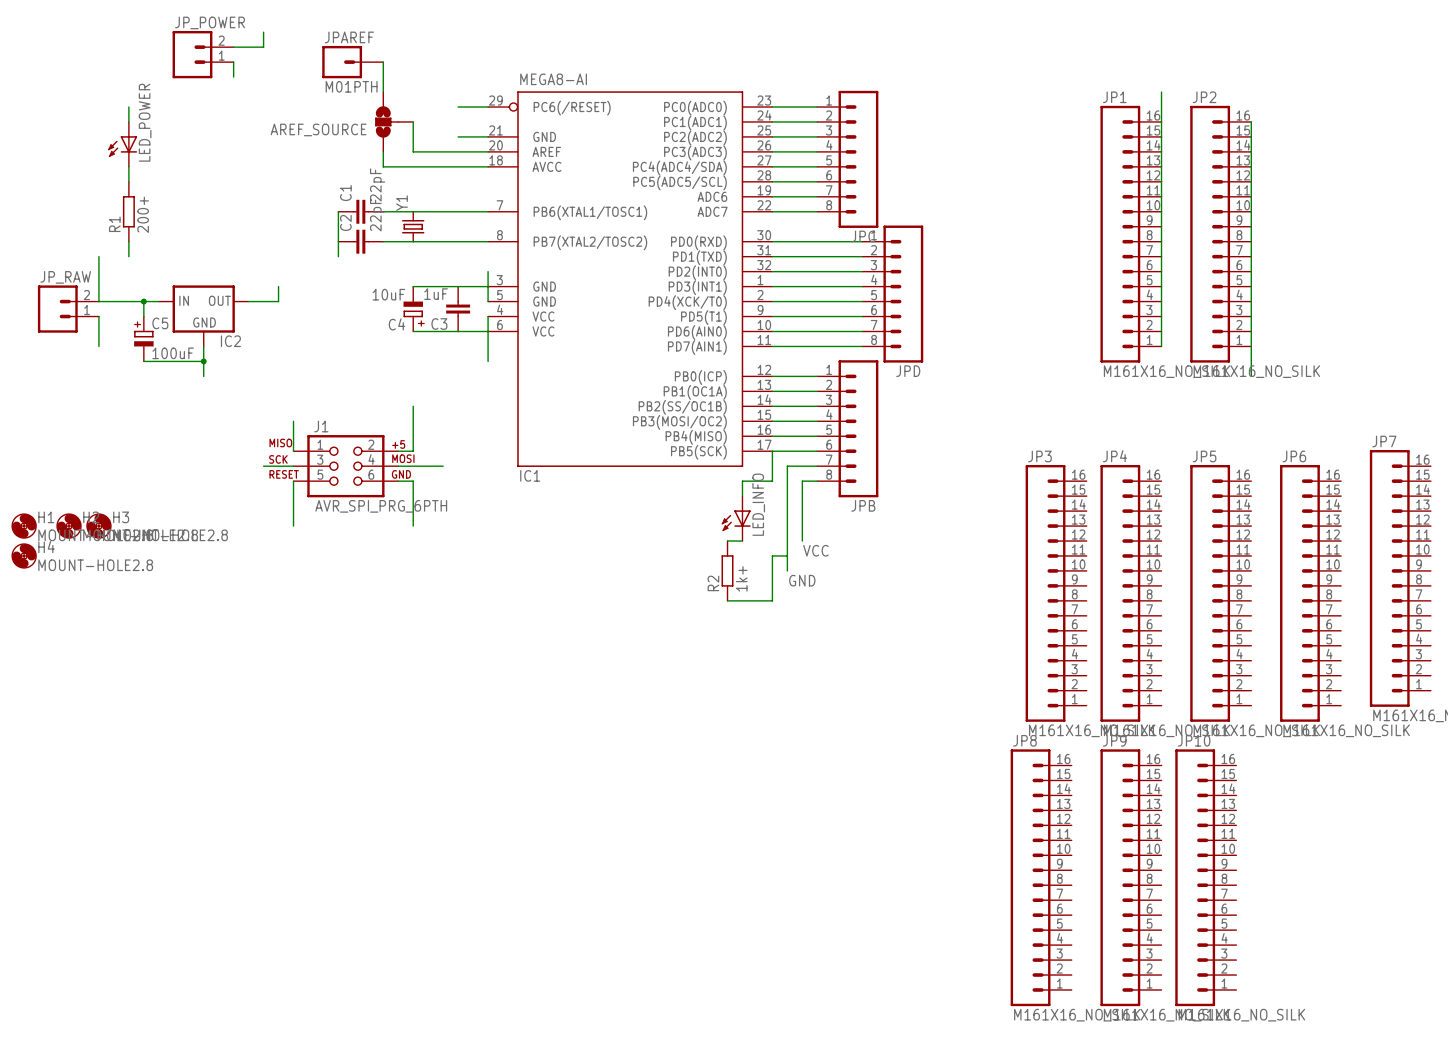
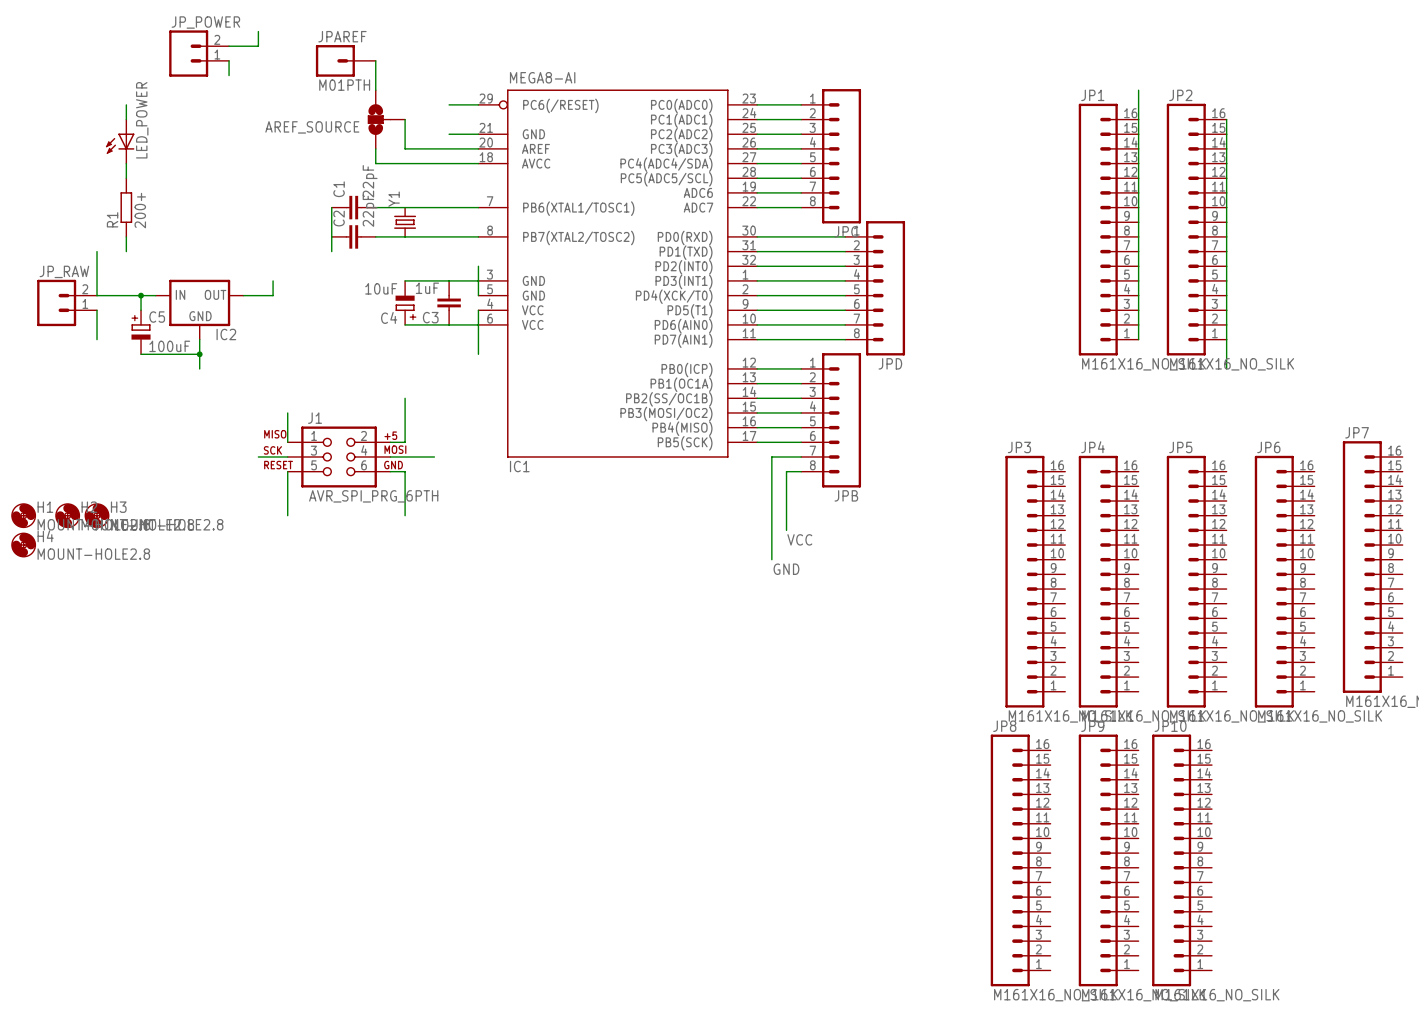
wire: (772, 451) (772, 481) (742, 481) (742, 496) -> none
LED_INFO: (736, 518) -> none
wire: (727, 541) (742, 541) -> none
wire: (787, 555) (772, 555) (772, 600) (727, 600) -> none
R2: 1k+ (727, 570) -> none

